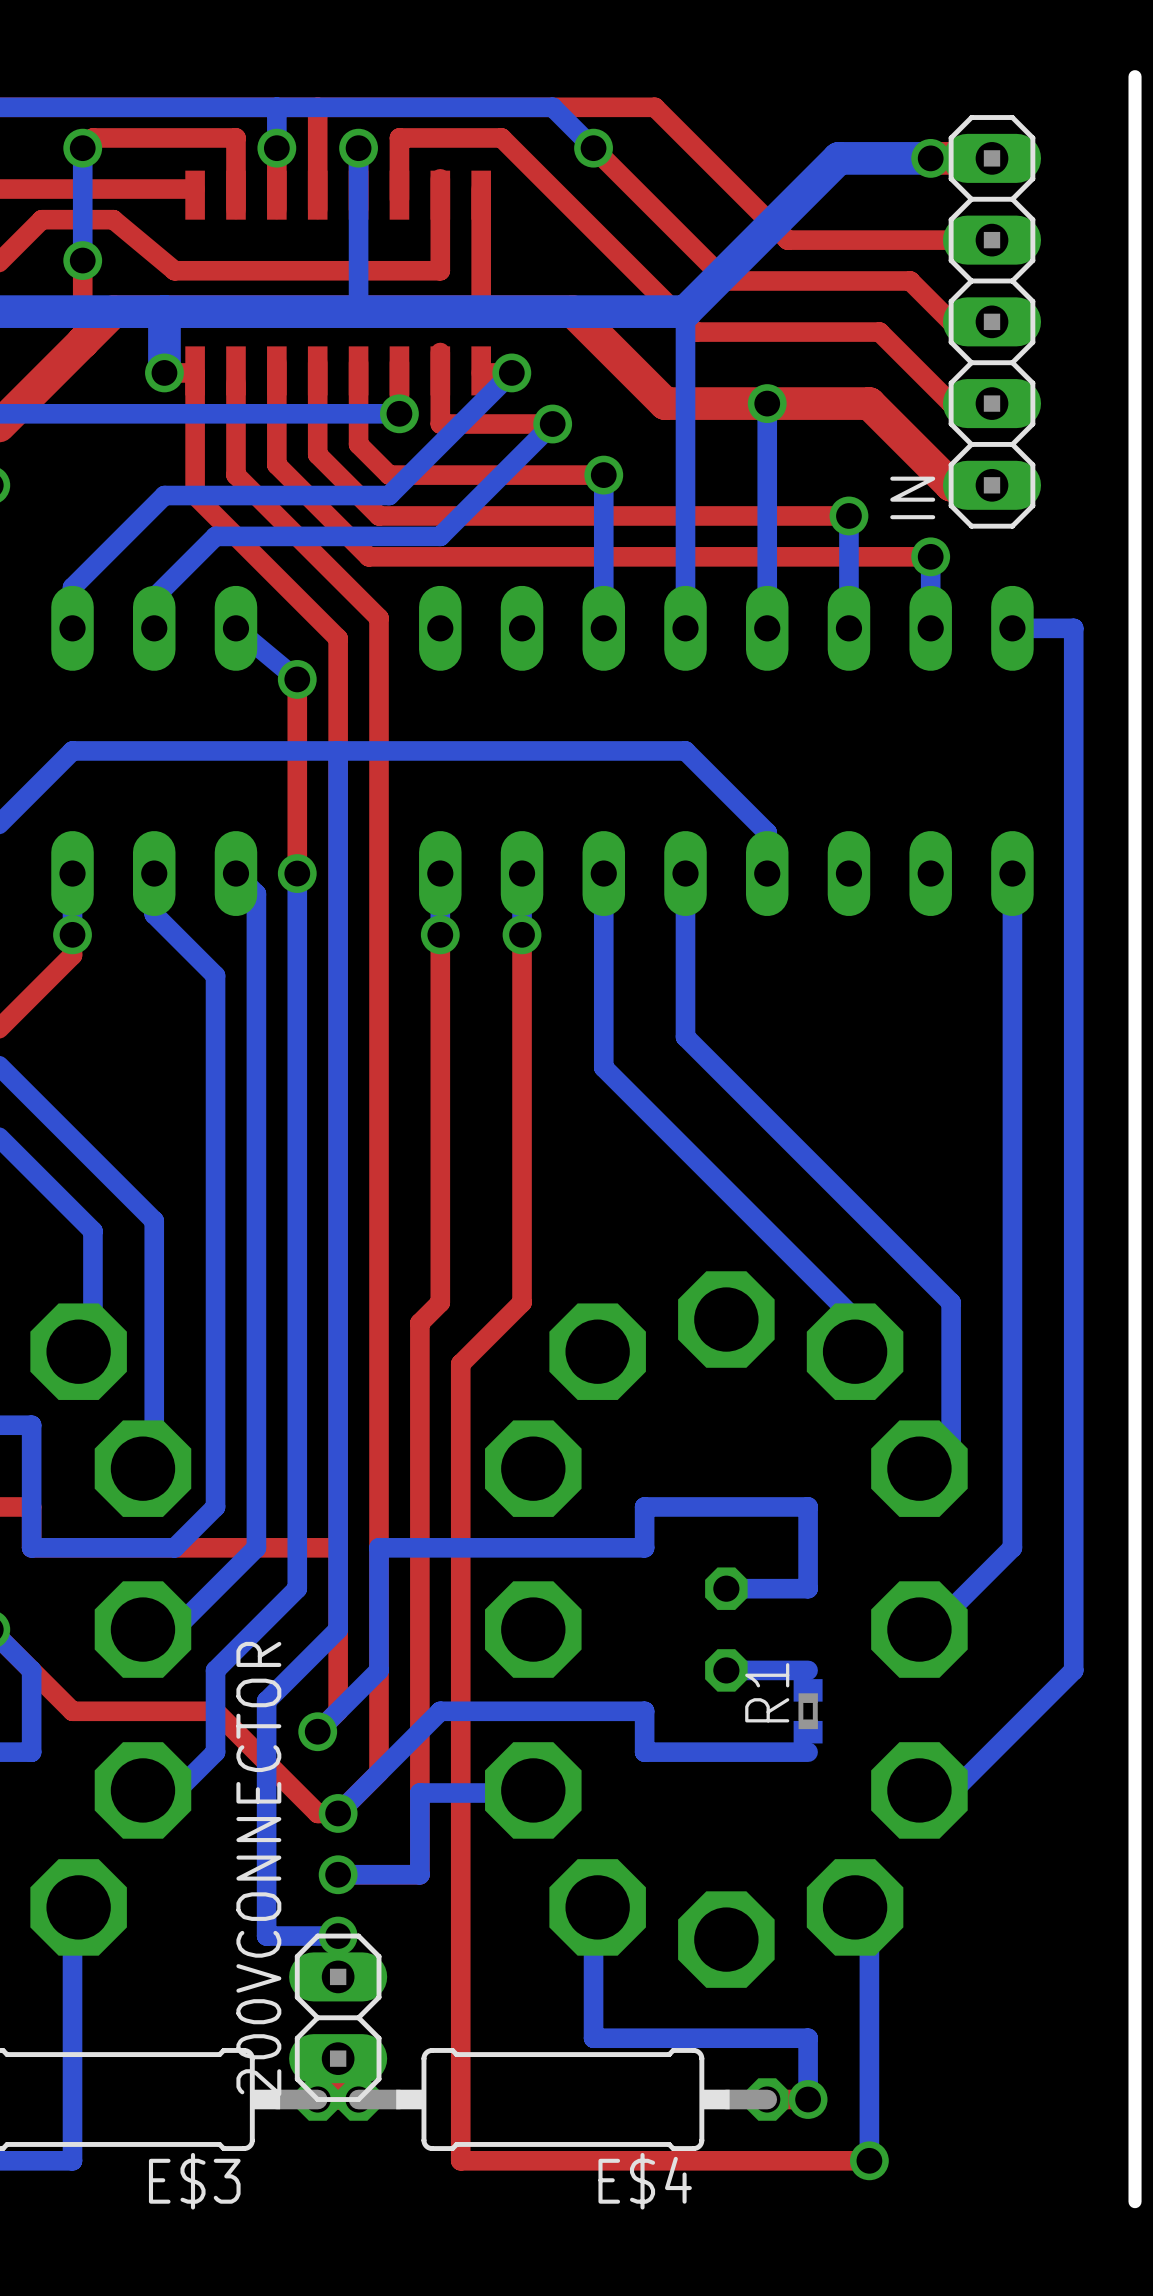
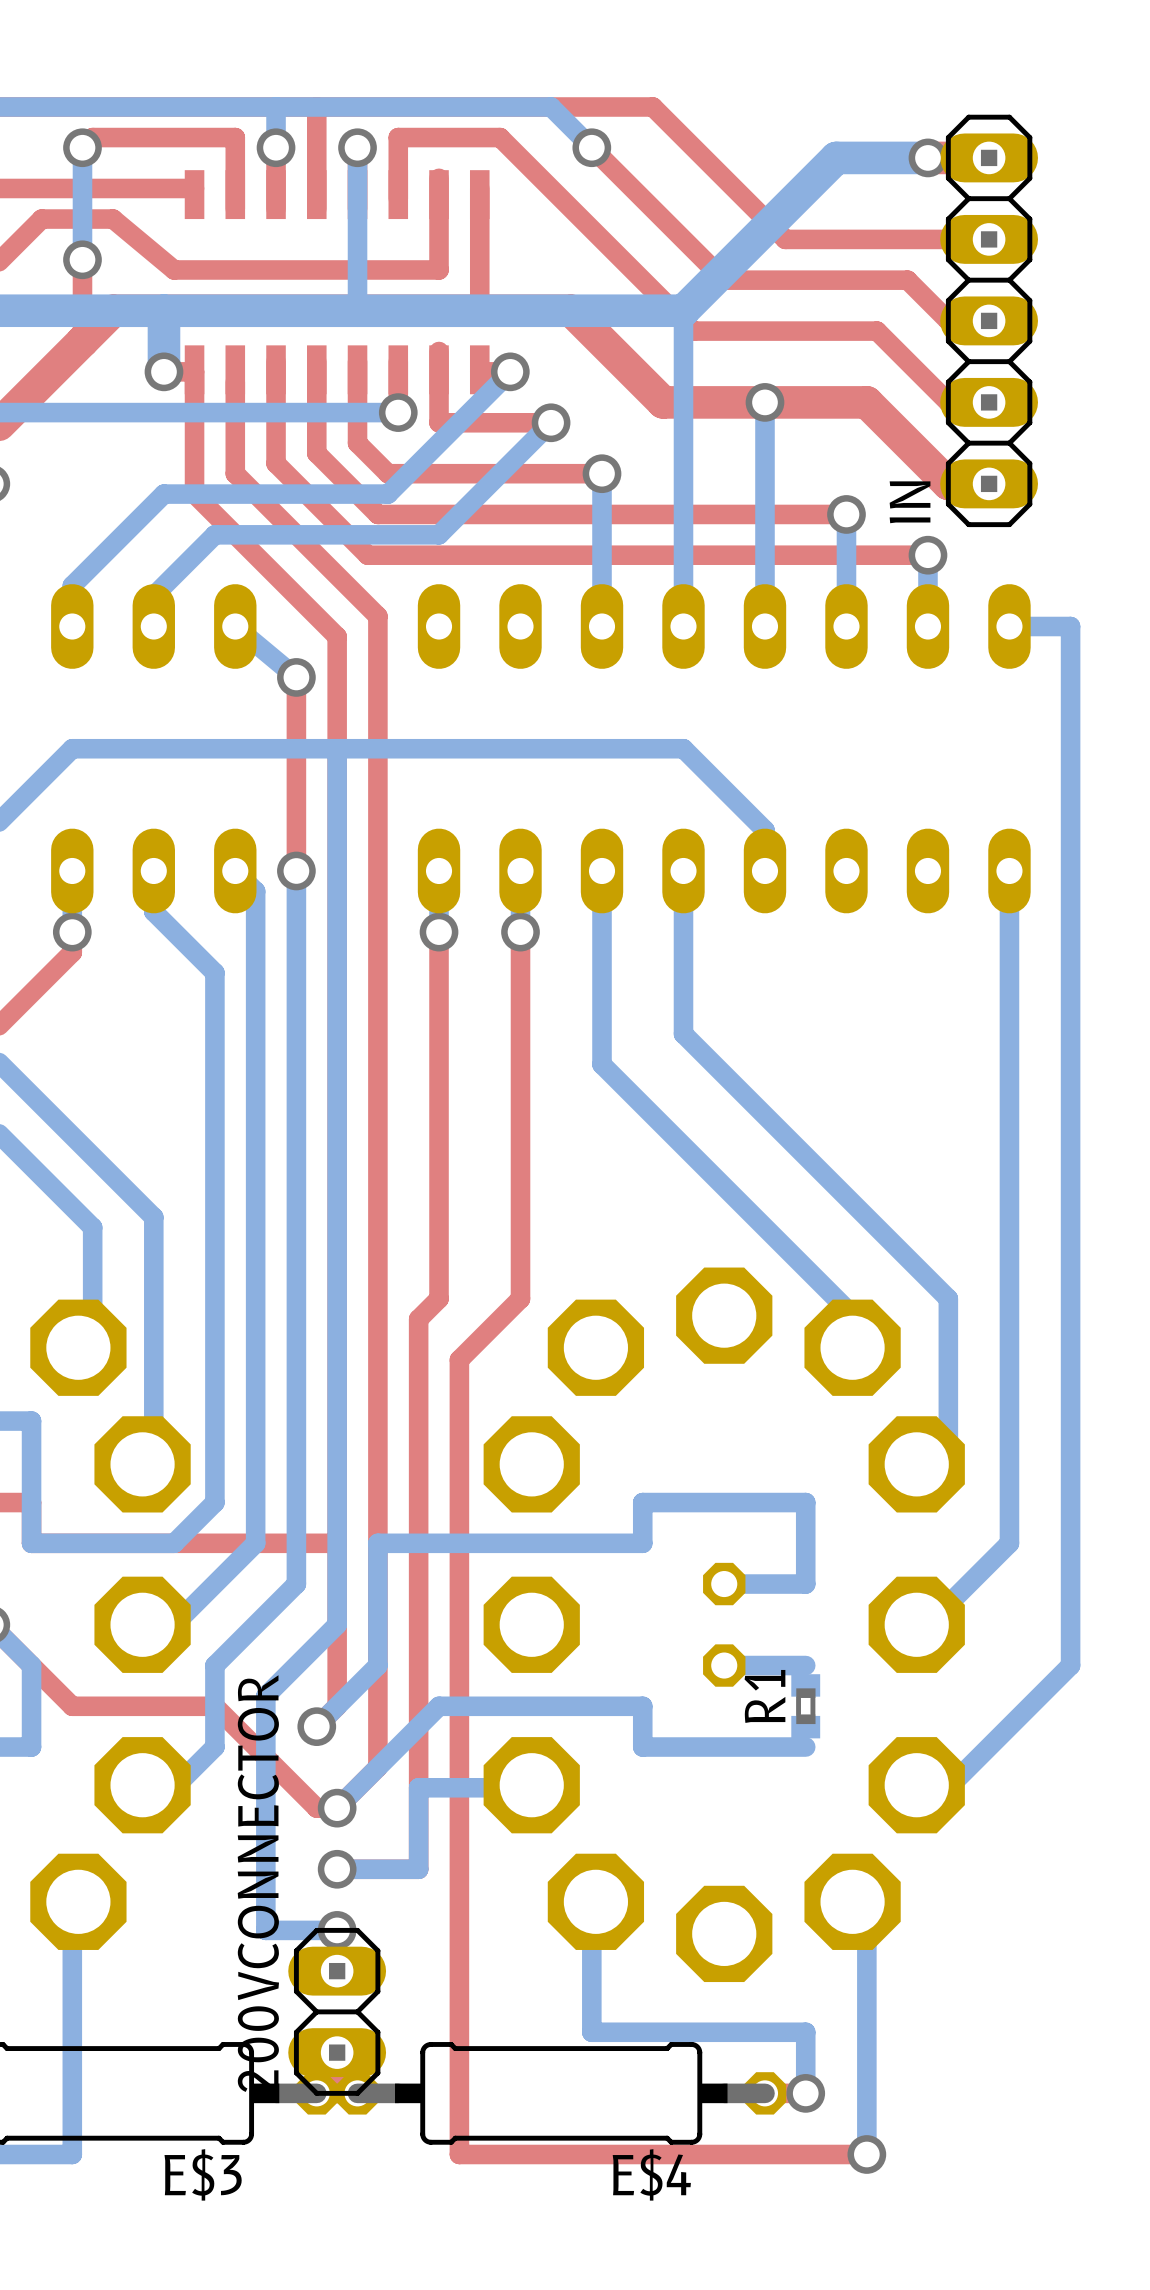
board edge: (1135, 76) (1135, 2201) -> none

